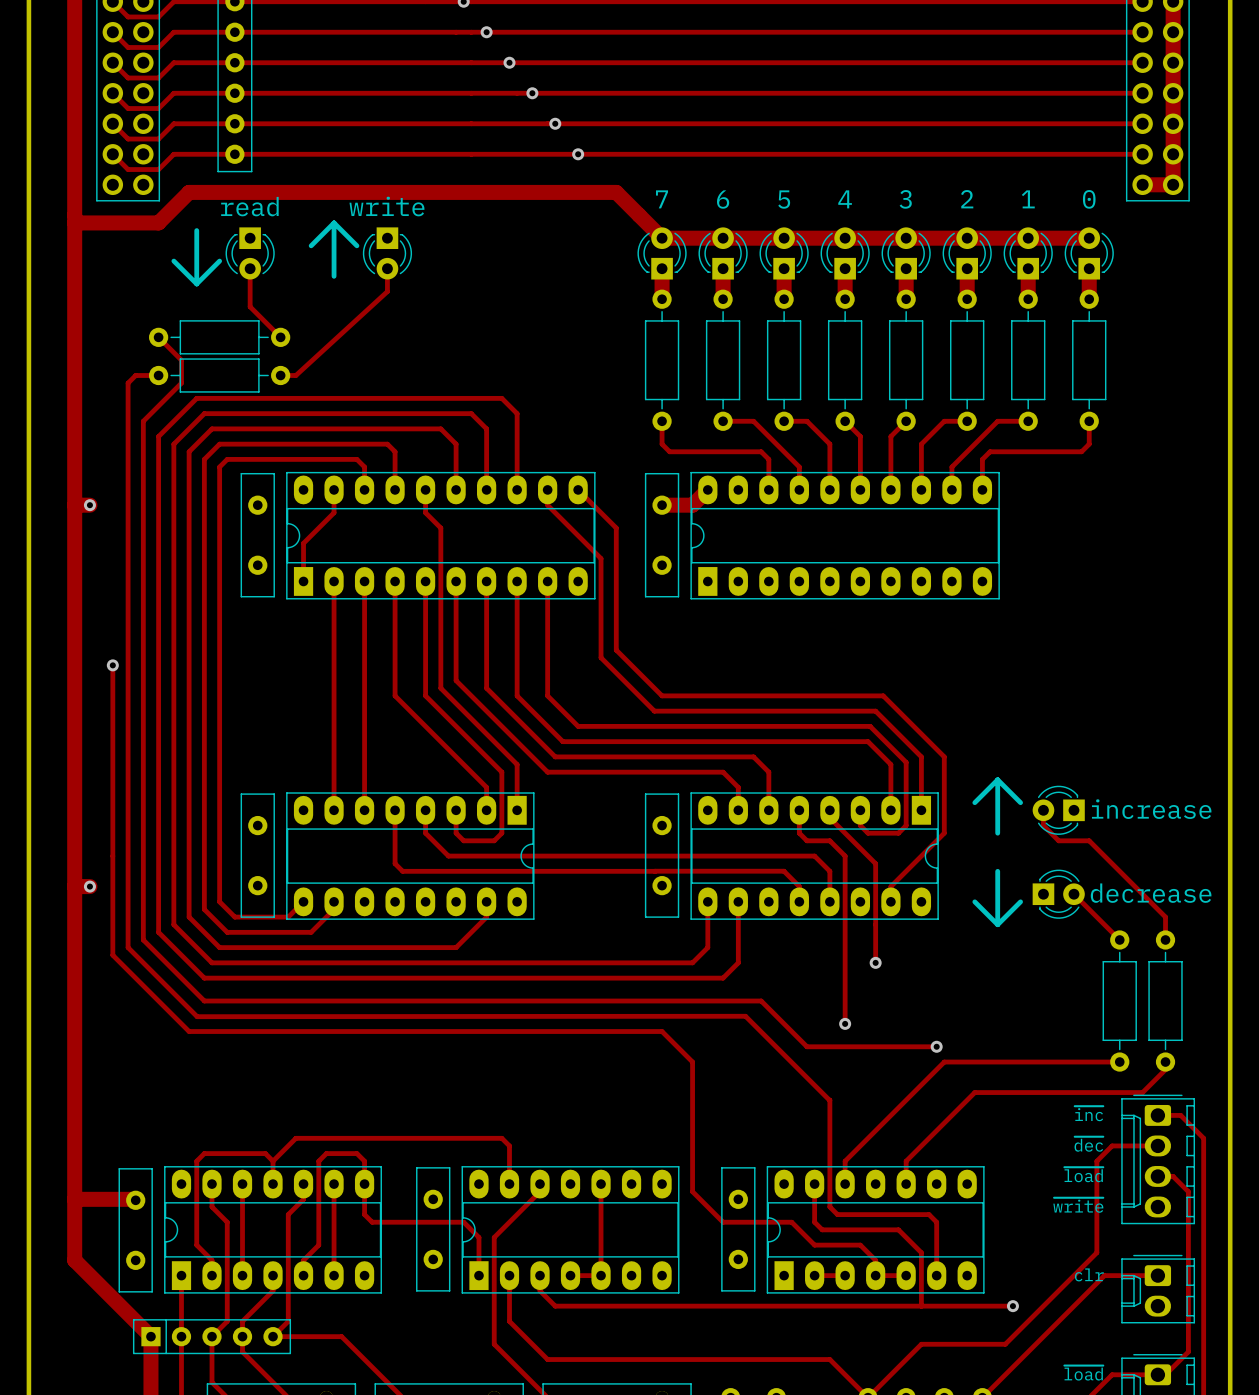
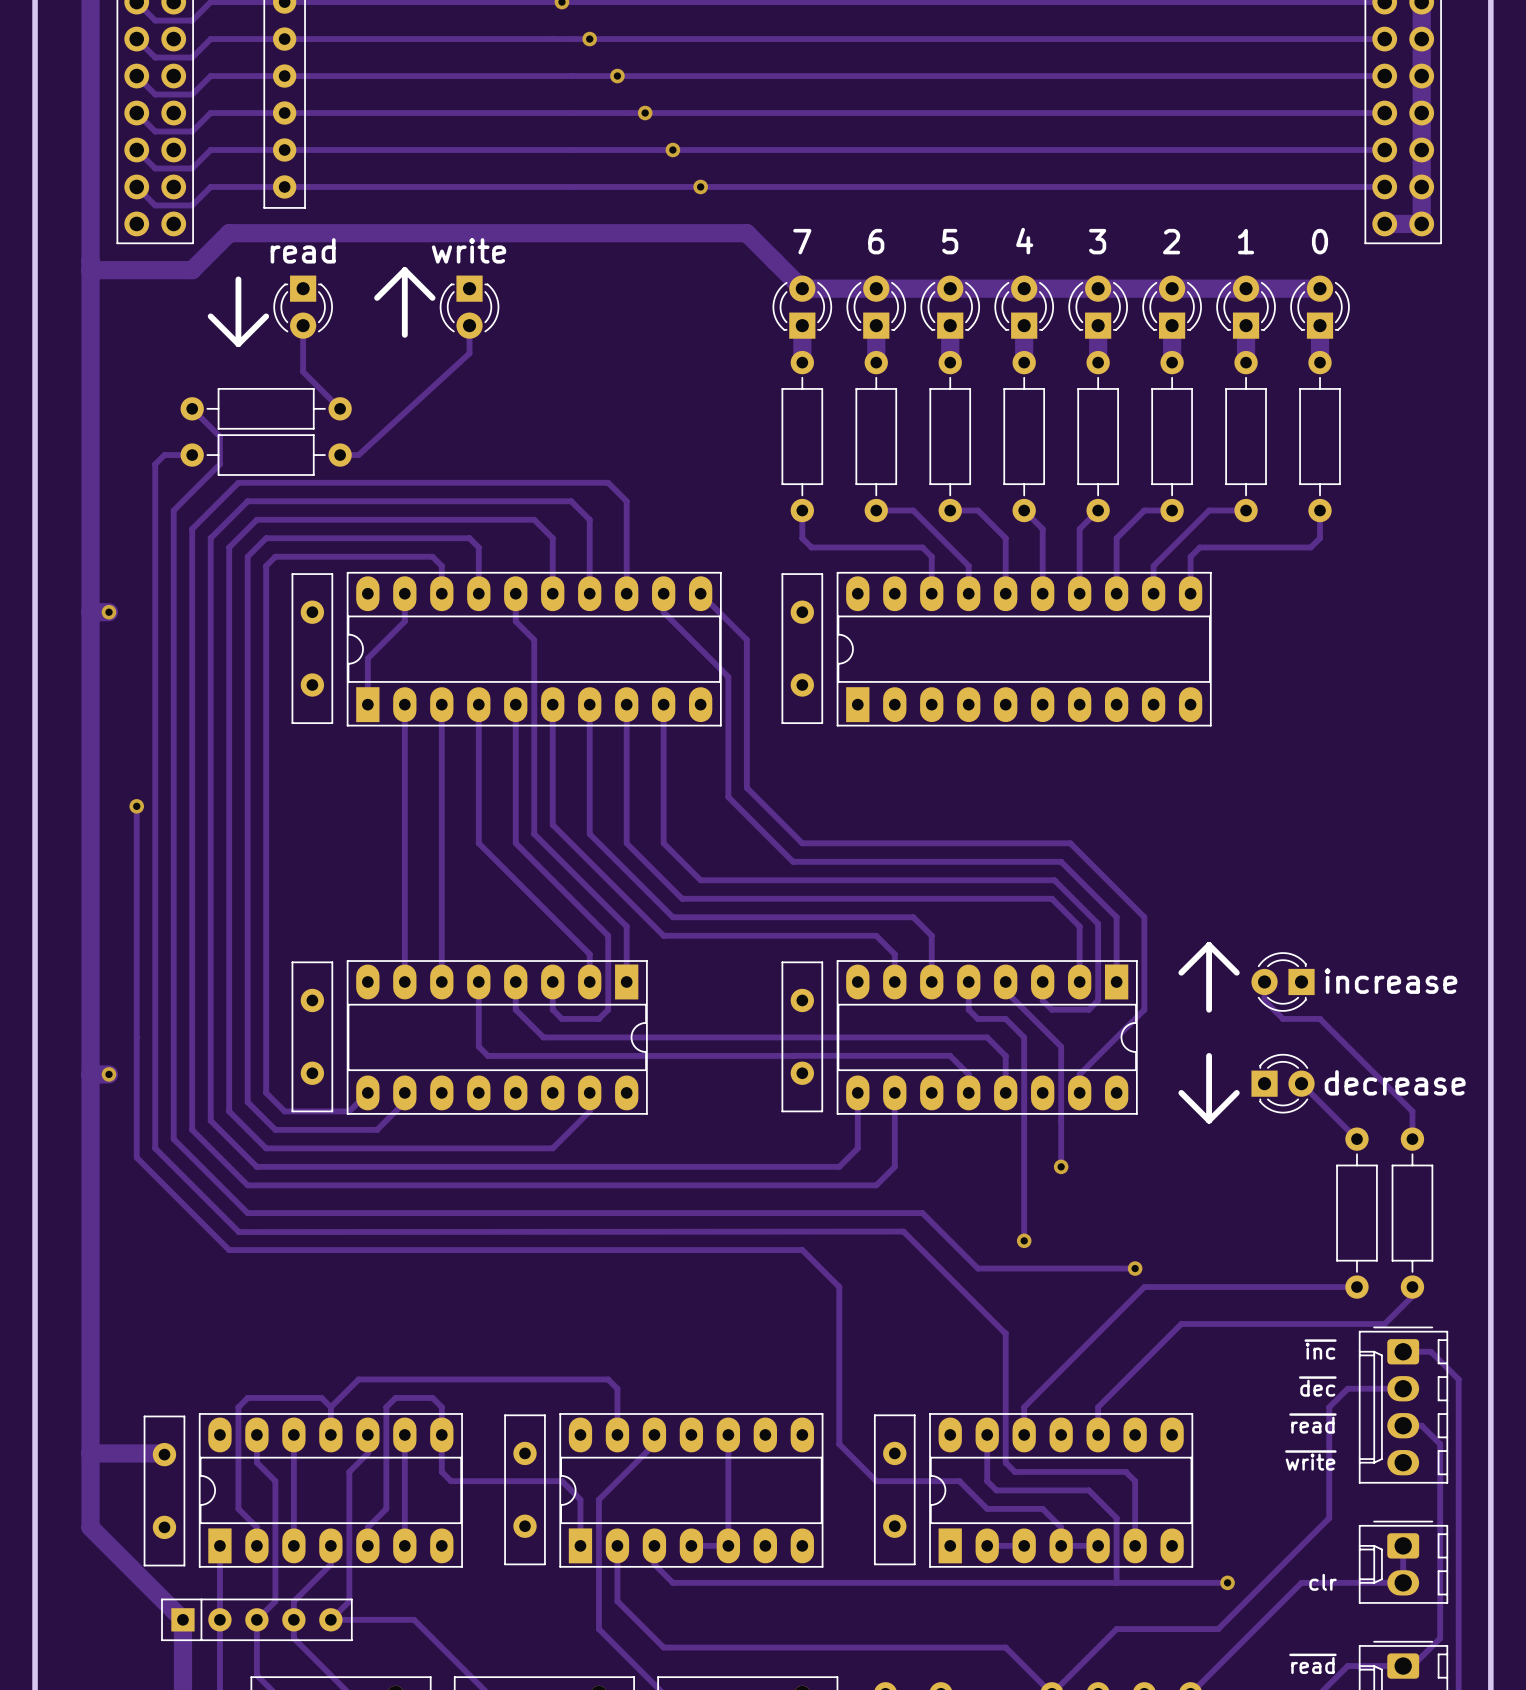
track: (707, 489) (692, 505) (662, 505) -> none
text: ~{load} (1083, 1174) -> ~{read} (1312, 1423)
text position: clr (1089, 1274) -> clr (1323, 1582)
track: (1157, 1275) (1104, 1275) (1073, 1306) -> (1403, 1545) (1403, 1582) (1301, 1582)
text: ~{load} (1083, 1373) -> ~{read} (1312, 1663)

